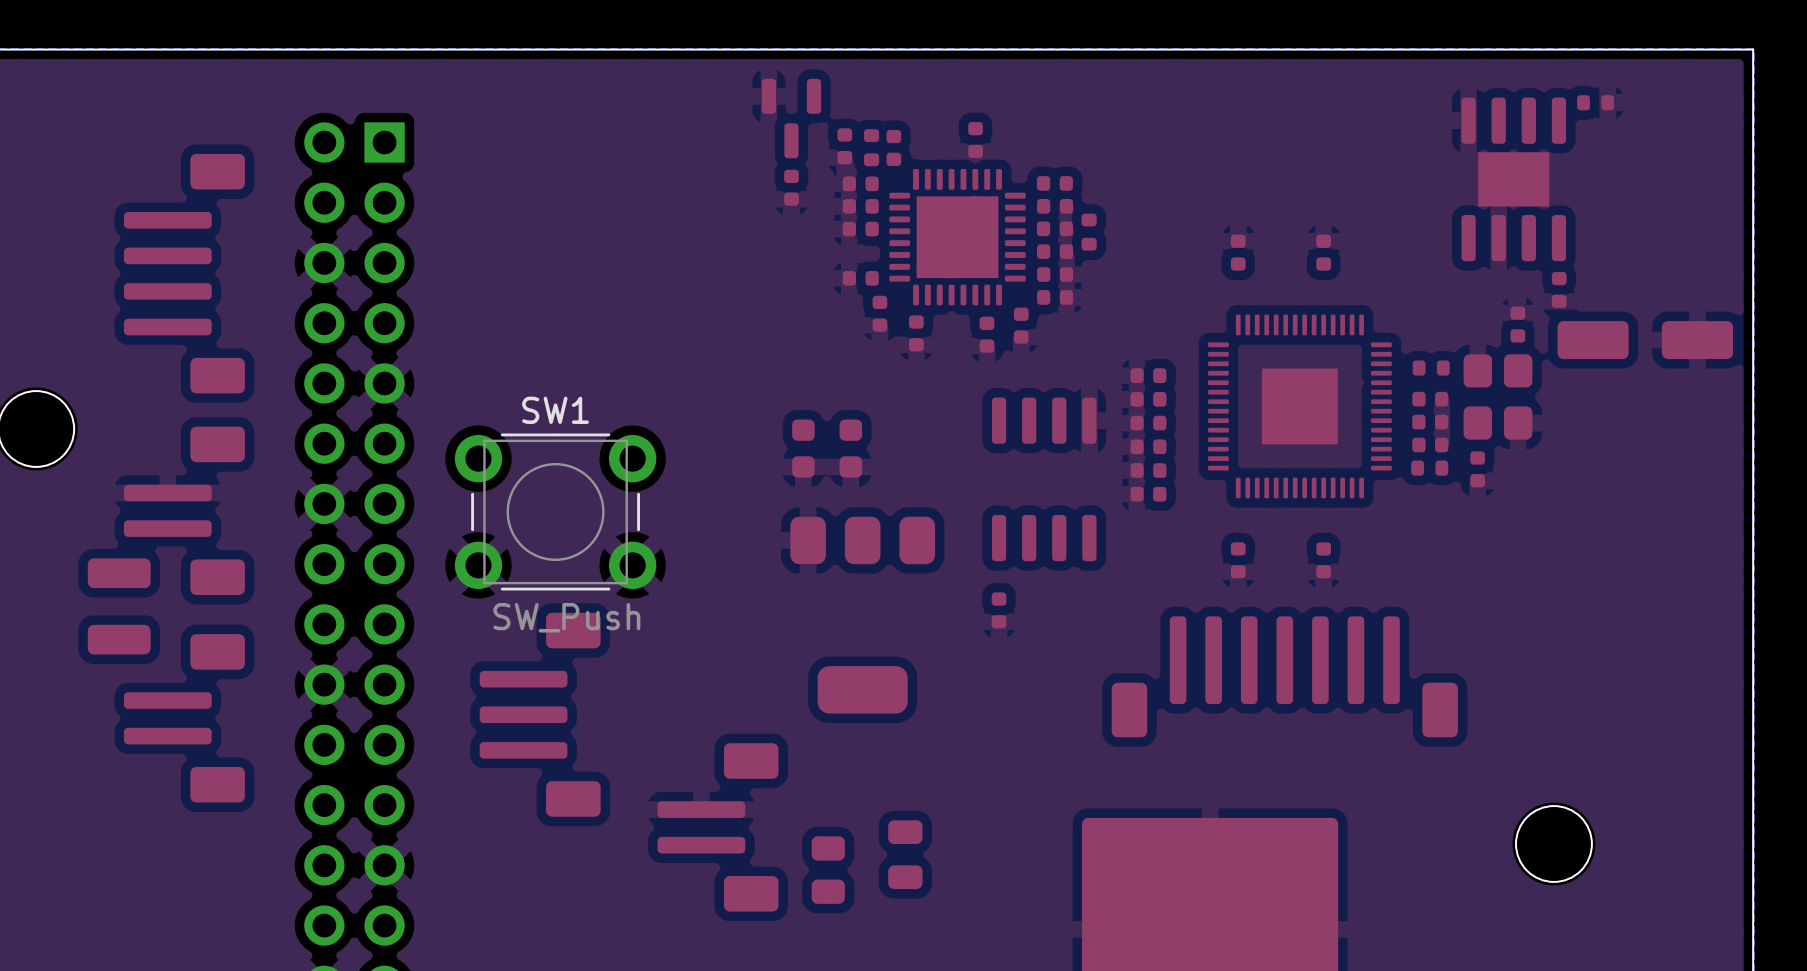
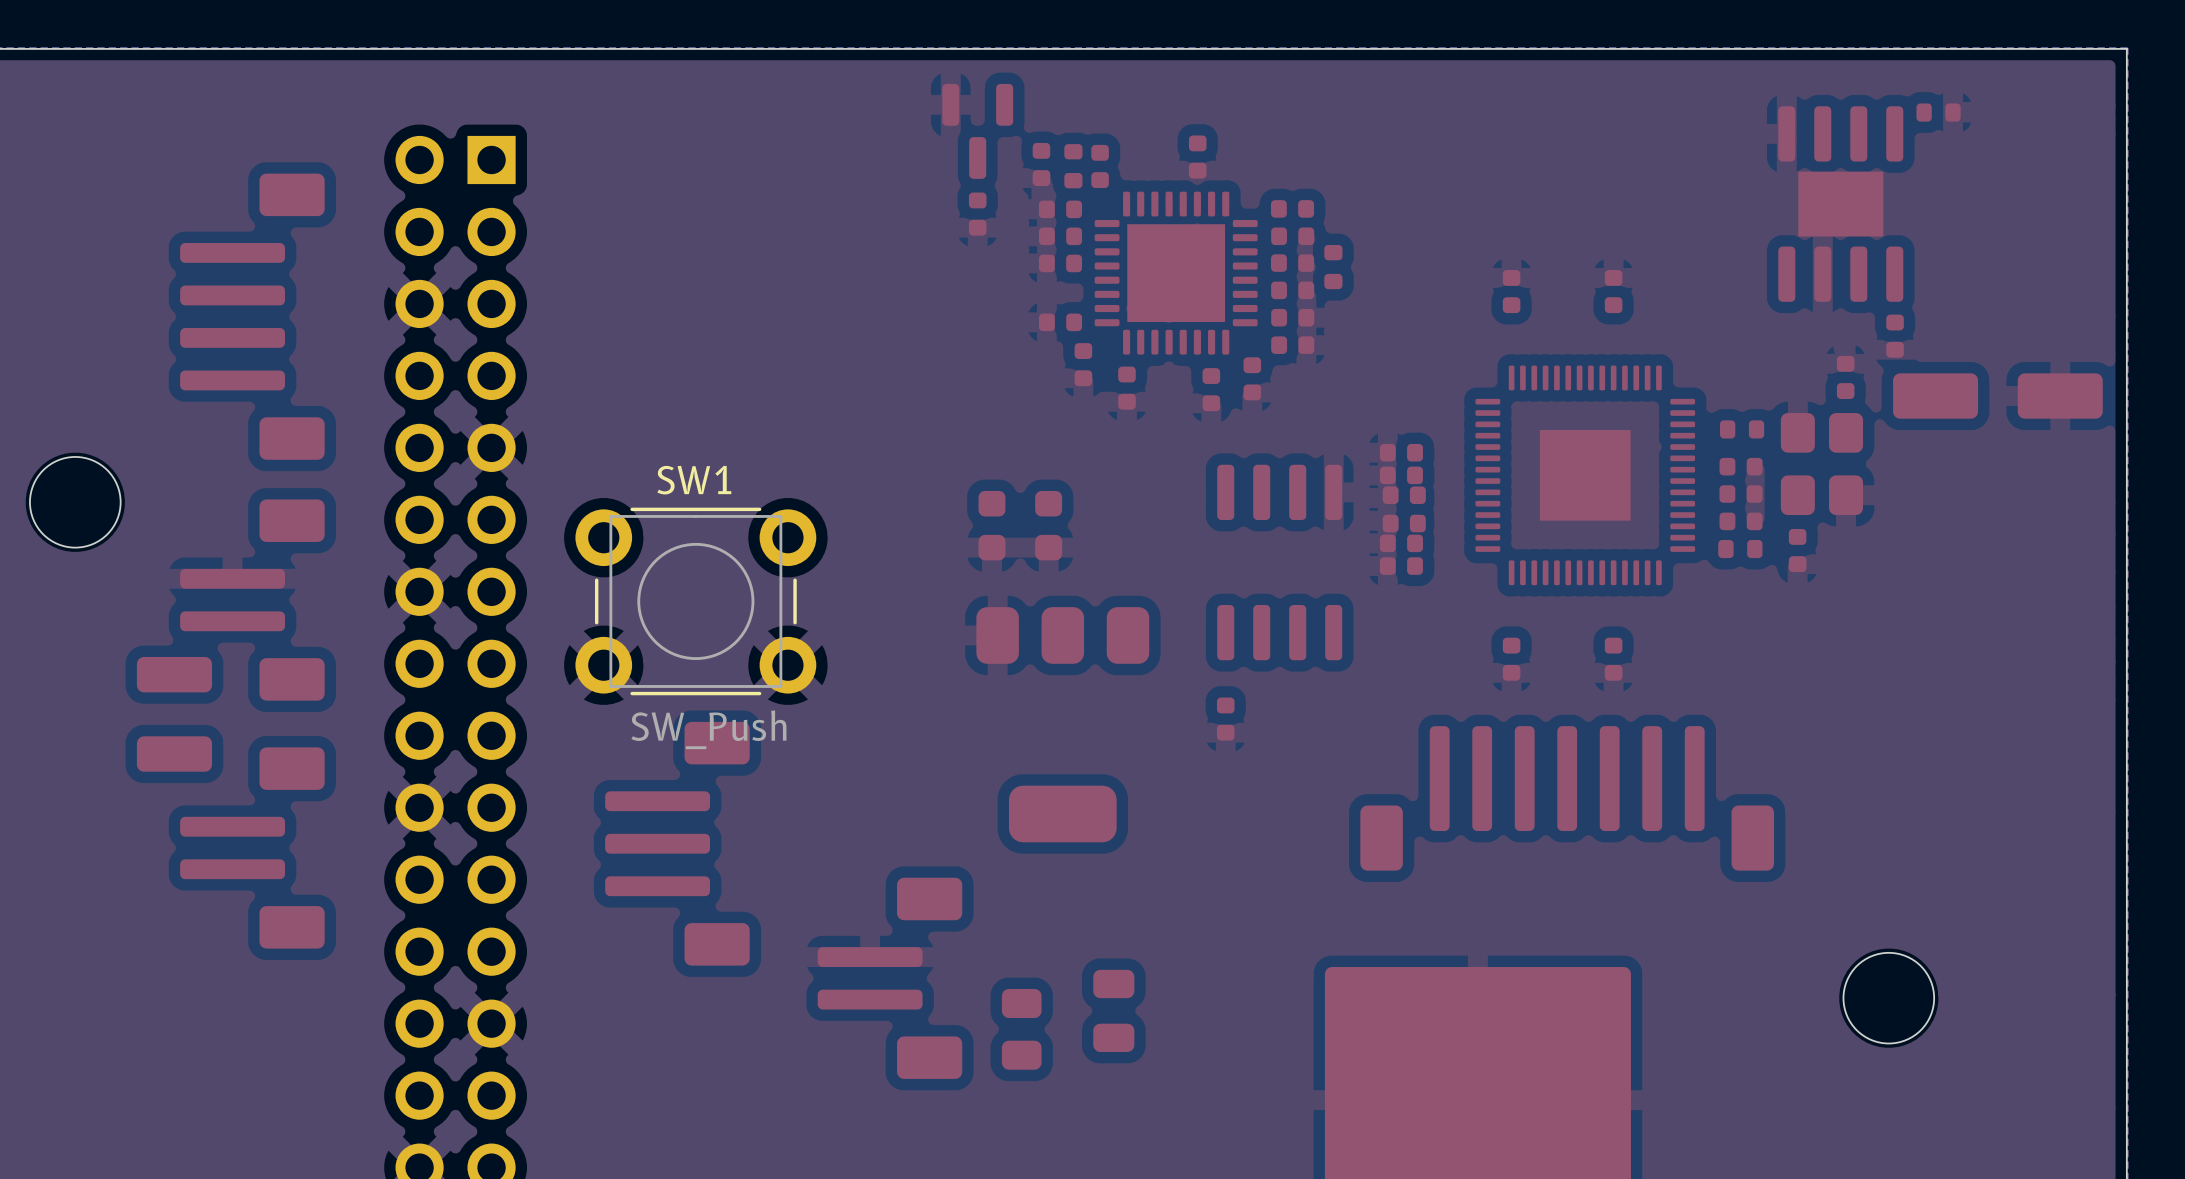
part: (1148, 375) -> none
part: none -> (1401, 452)
part: (1148, 399) -> none
part: none -> (1401, 475)
part: none -> (1401, 543)
part: (1148, 470) -> none
part: none -> (1401, 566)
part: (1148, 494) -> none

